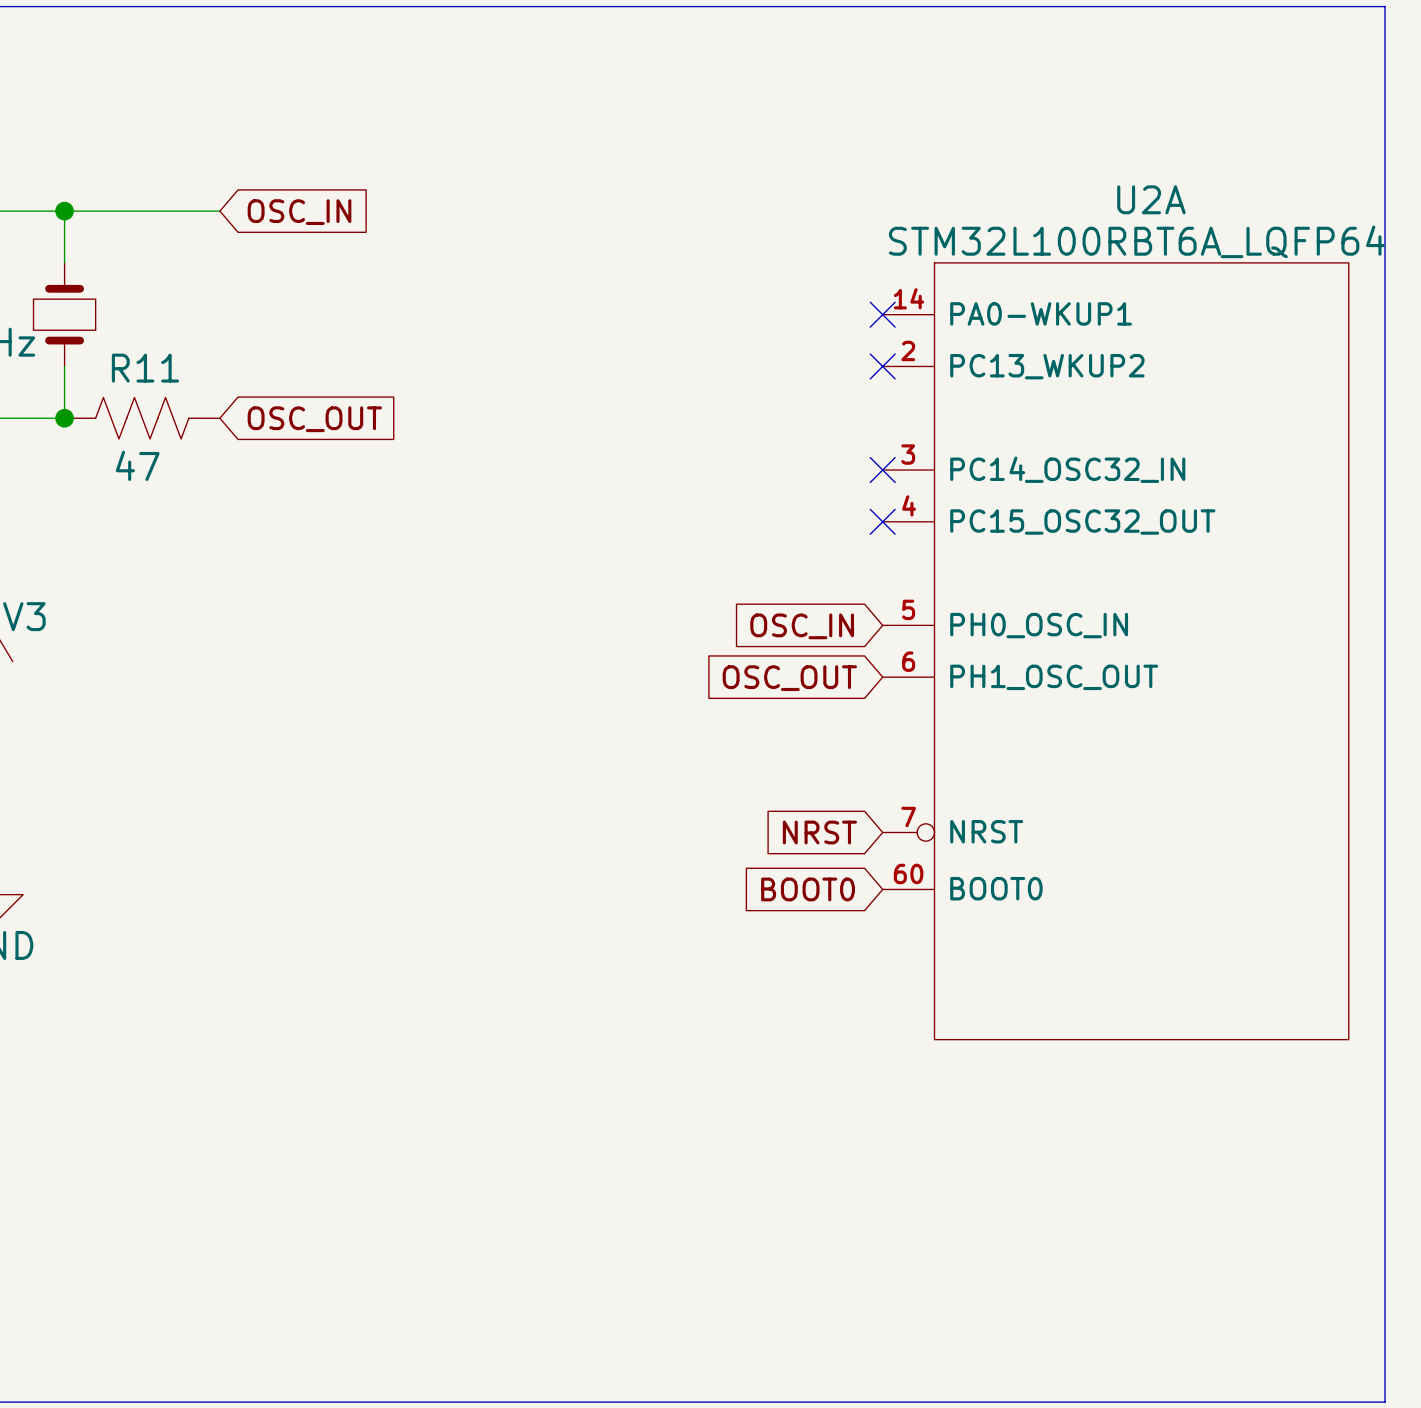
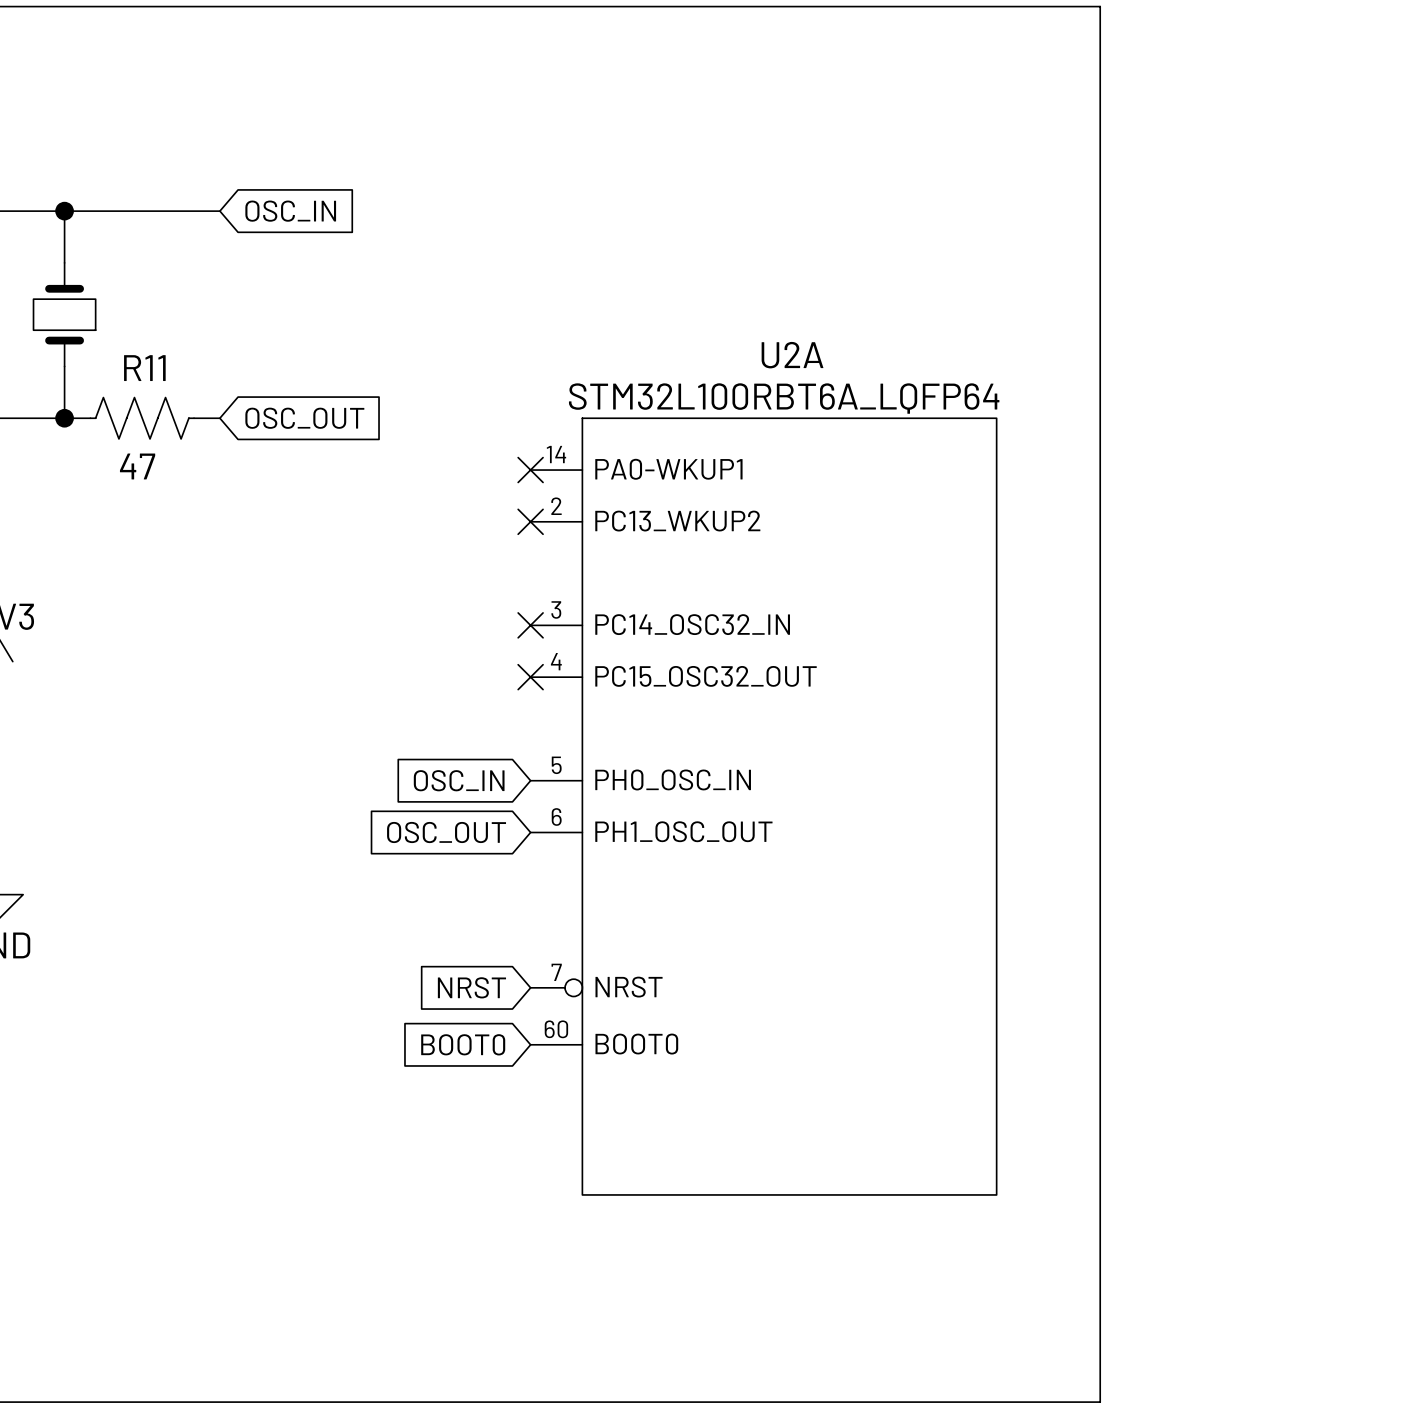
line: (1100, 6) (1385, 6) (1385, 1402) (1100, 1402) -> (1100, 6) (1100, 1402)
no-connect mark: (882, 314) -> none
no-connect mark: (882, 366) -> none
no-connect mark: none -> (530, 470)
no-connect mark: (882, 470) -> none
no-connect mark: none -> (530, 521)
no-connect mark: (882, 521) -> none
no-connect mark: none -> (530, 625)
global label position: OSC_IN (802, 626) -> OSC_IN (459, 780)
U2A position: (1115, 651) -> (763, 806)
no-connect mark: none -> (530, 677)
global label position: OSC_OUT (789, 678) -> OSC_OUT (446, 832)
global label position: NRST (819, 832) -> NRST (471, 987)
global label position: BOOT0 (808, 889) -> BOOT0 (463, 1044)

